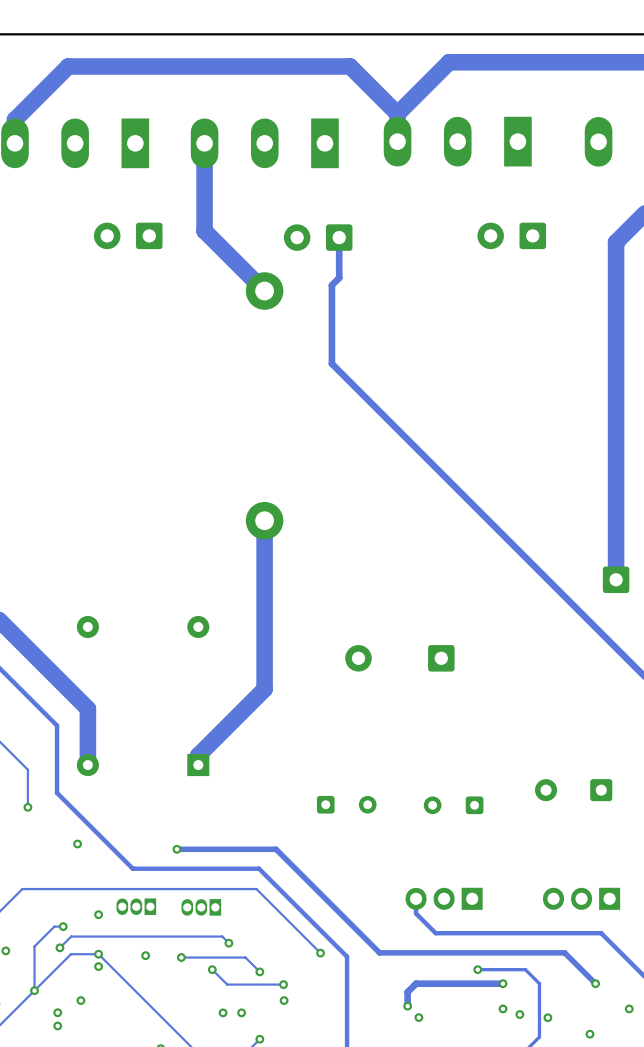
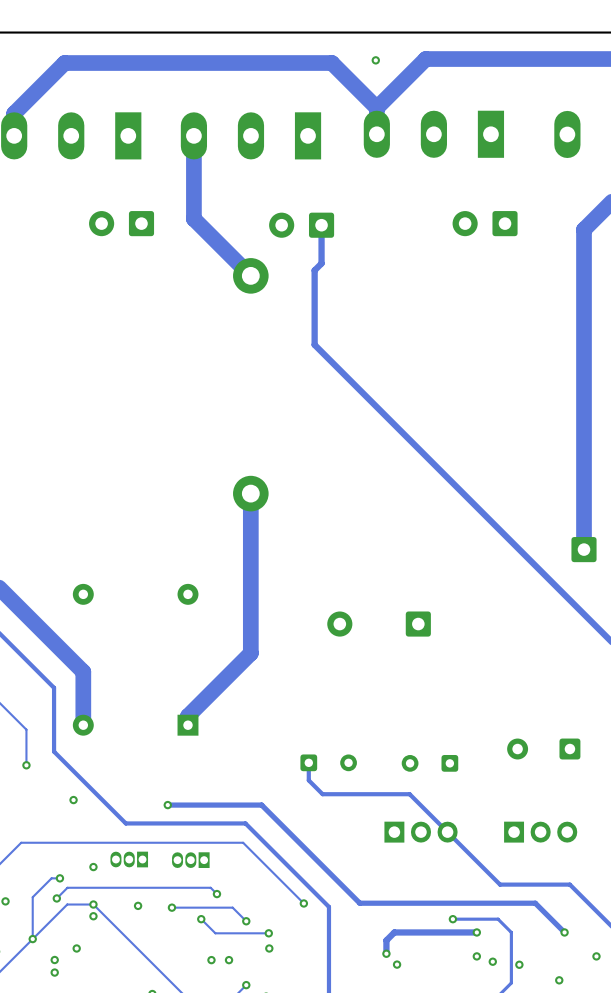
via: none -> (375, 60)
track: (416, 898) (416, 913) (435, 933) (527, 933) -> (308, 762) (308, 780) (322, 794) (409, 794) (500, 884)
part rotation: 0° (444, 898) -> 180° (420, 832)
part rotation: 0° (581, 898) -> 180° (540, 832)

